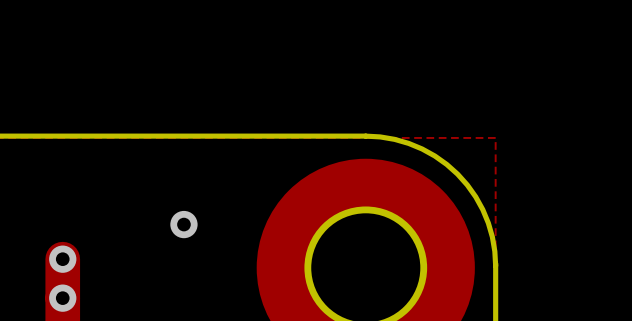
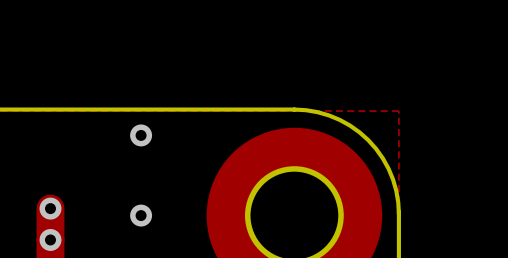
via: none -> (141, 135)
via: (183, 224) -> none
via: none -> (141, 215)

